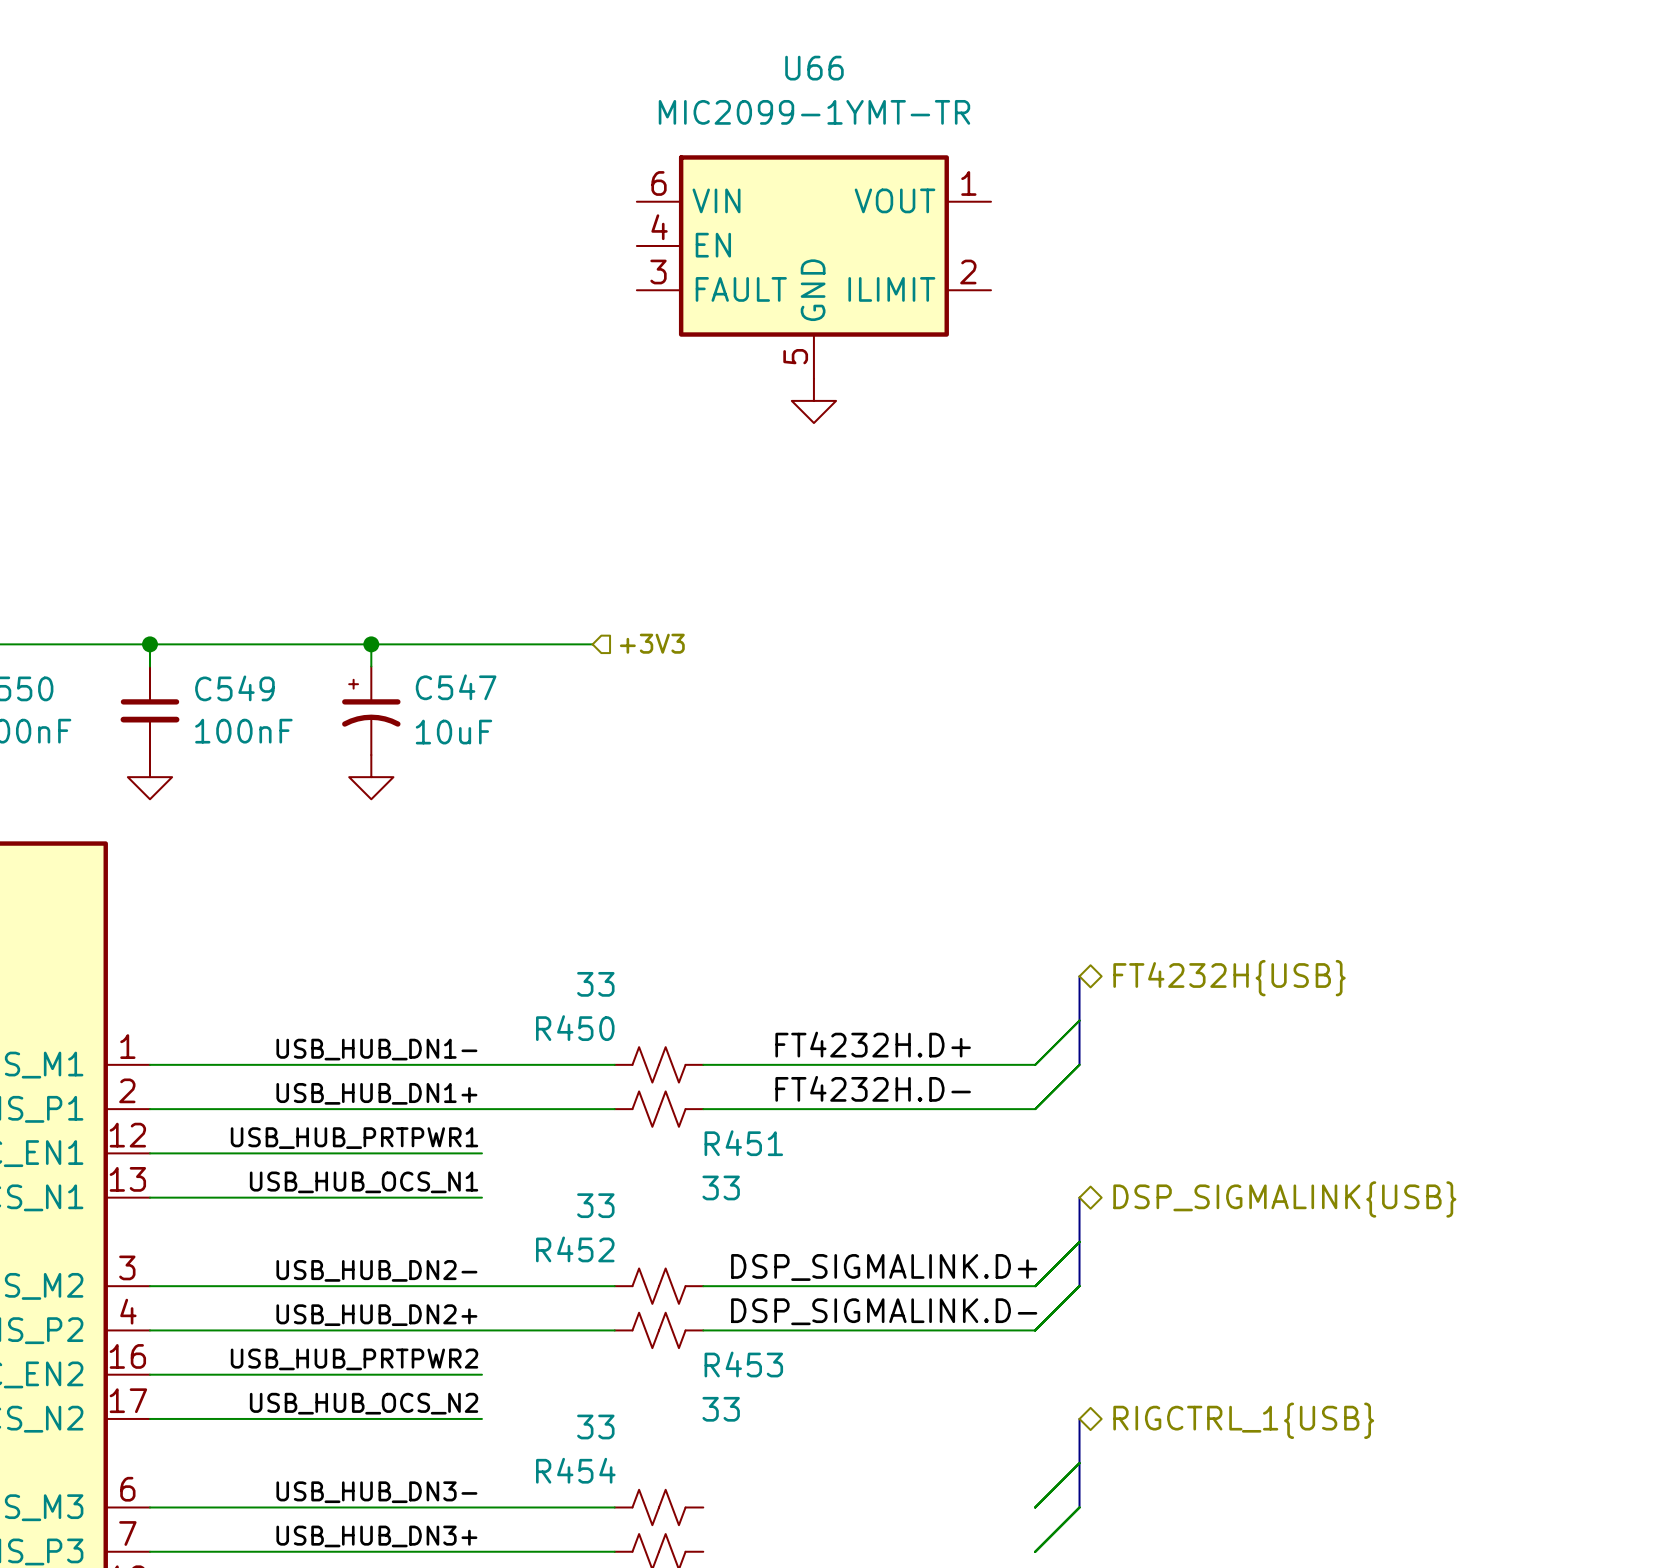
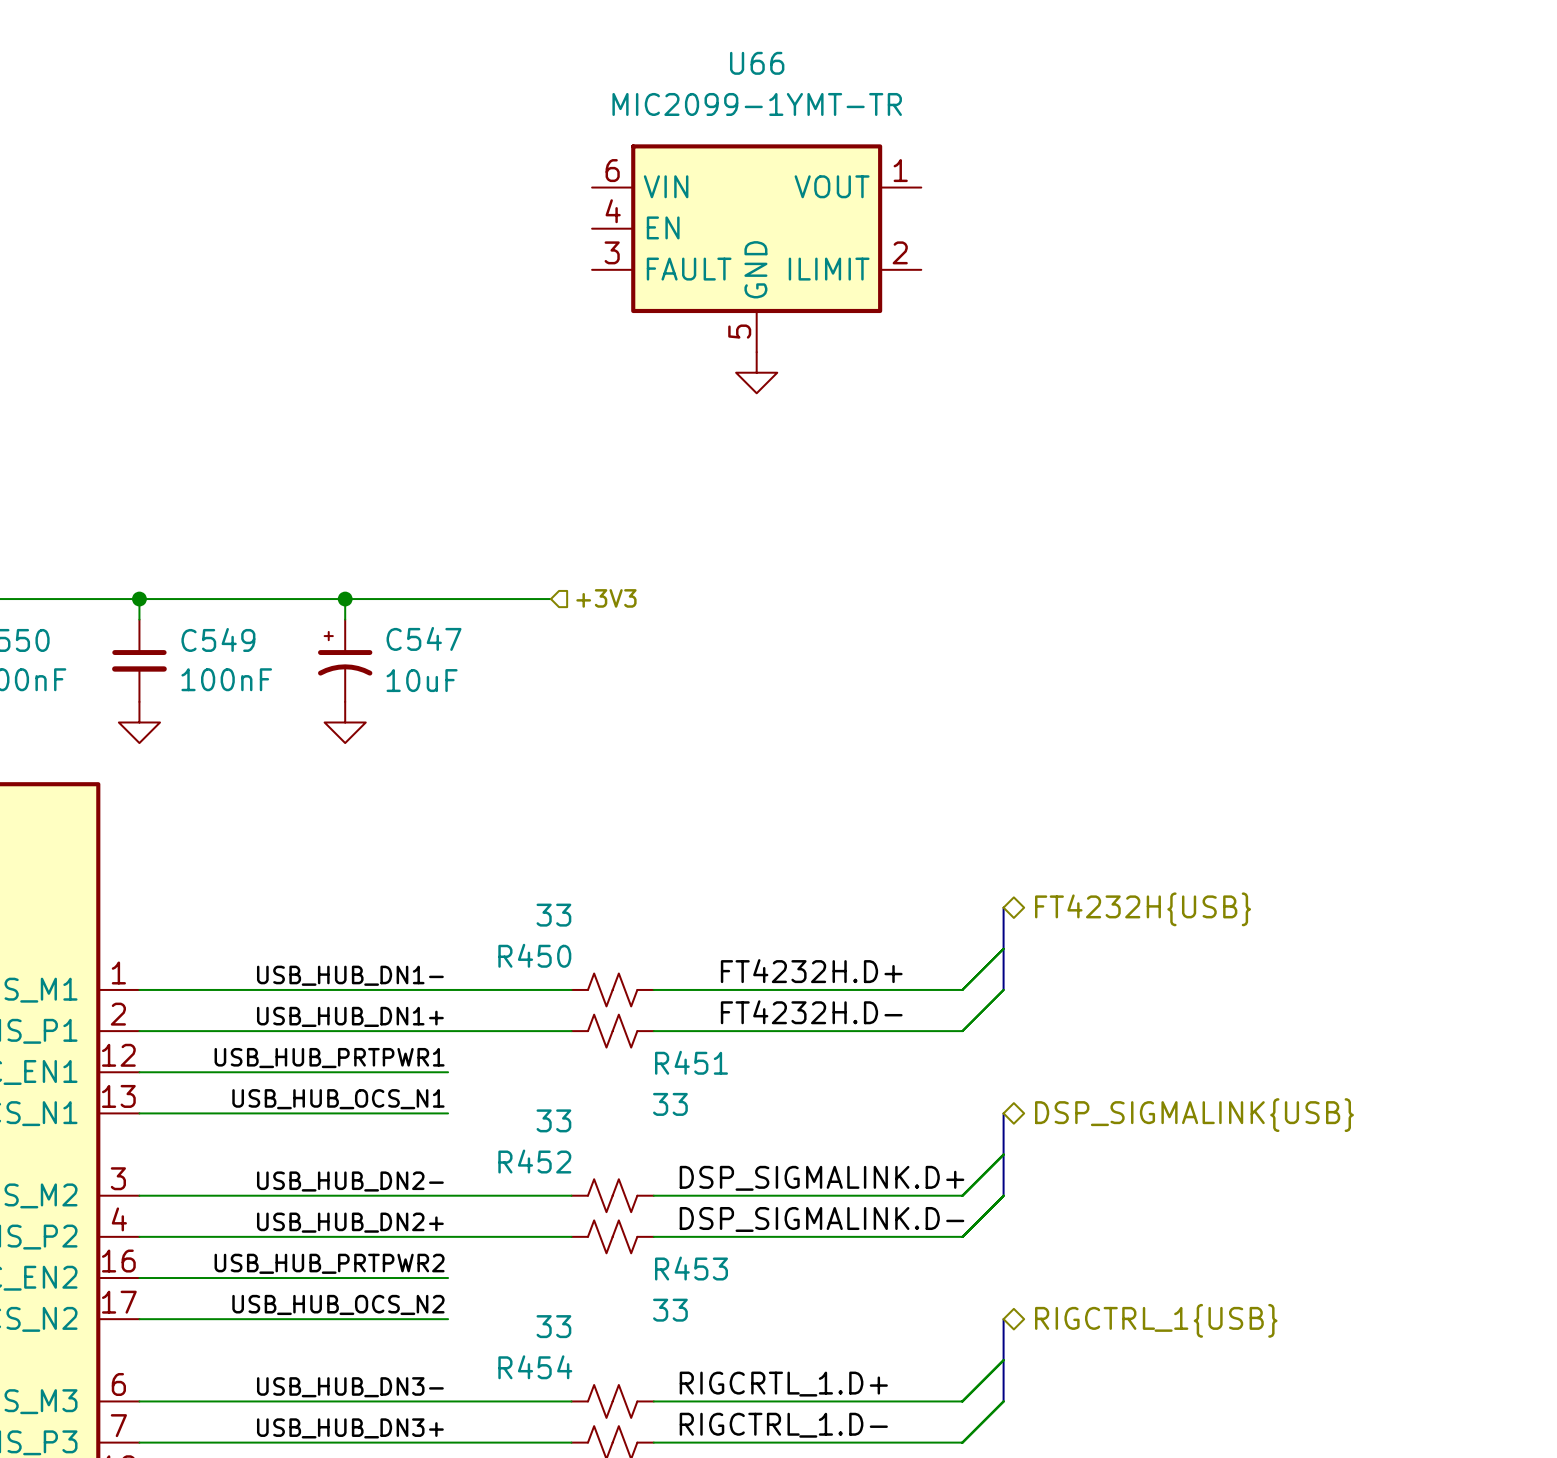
label: none -> RIGCRTL_1.D+ (783, 1384)
wire: none -> (653, 1401) (962, 1401)
label: none -> RIGCTRL_1.D- (783, 1425)
wire: none -> (653, 1442) (962, 1442)

